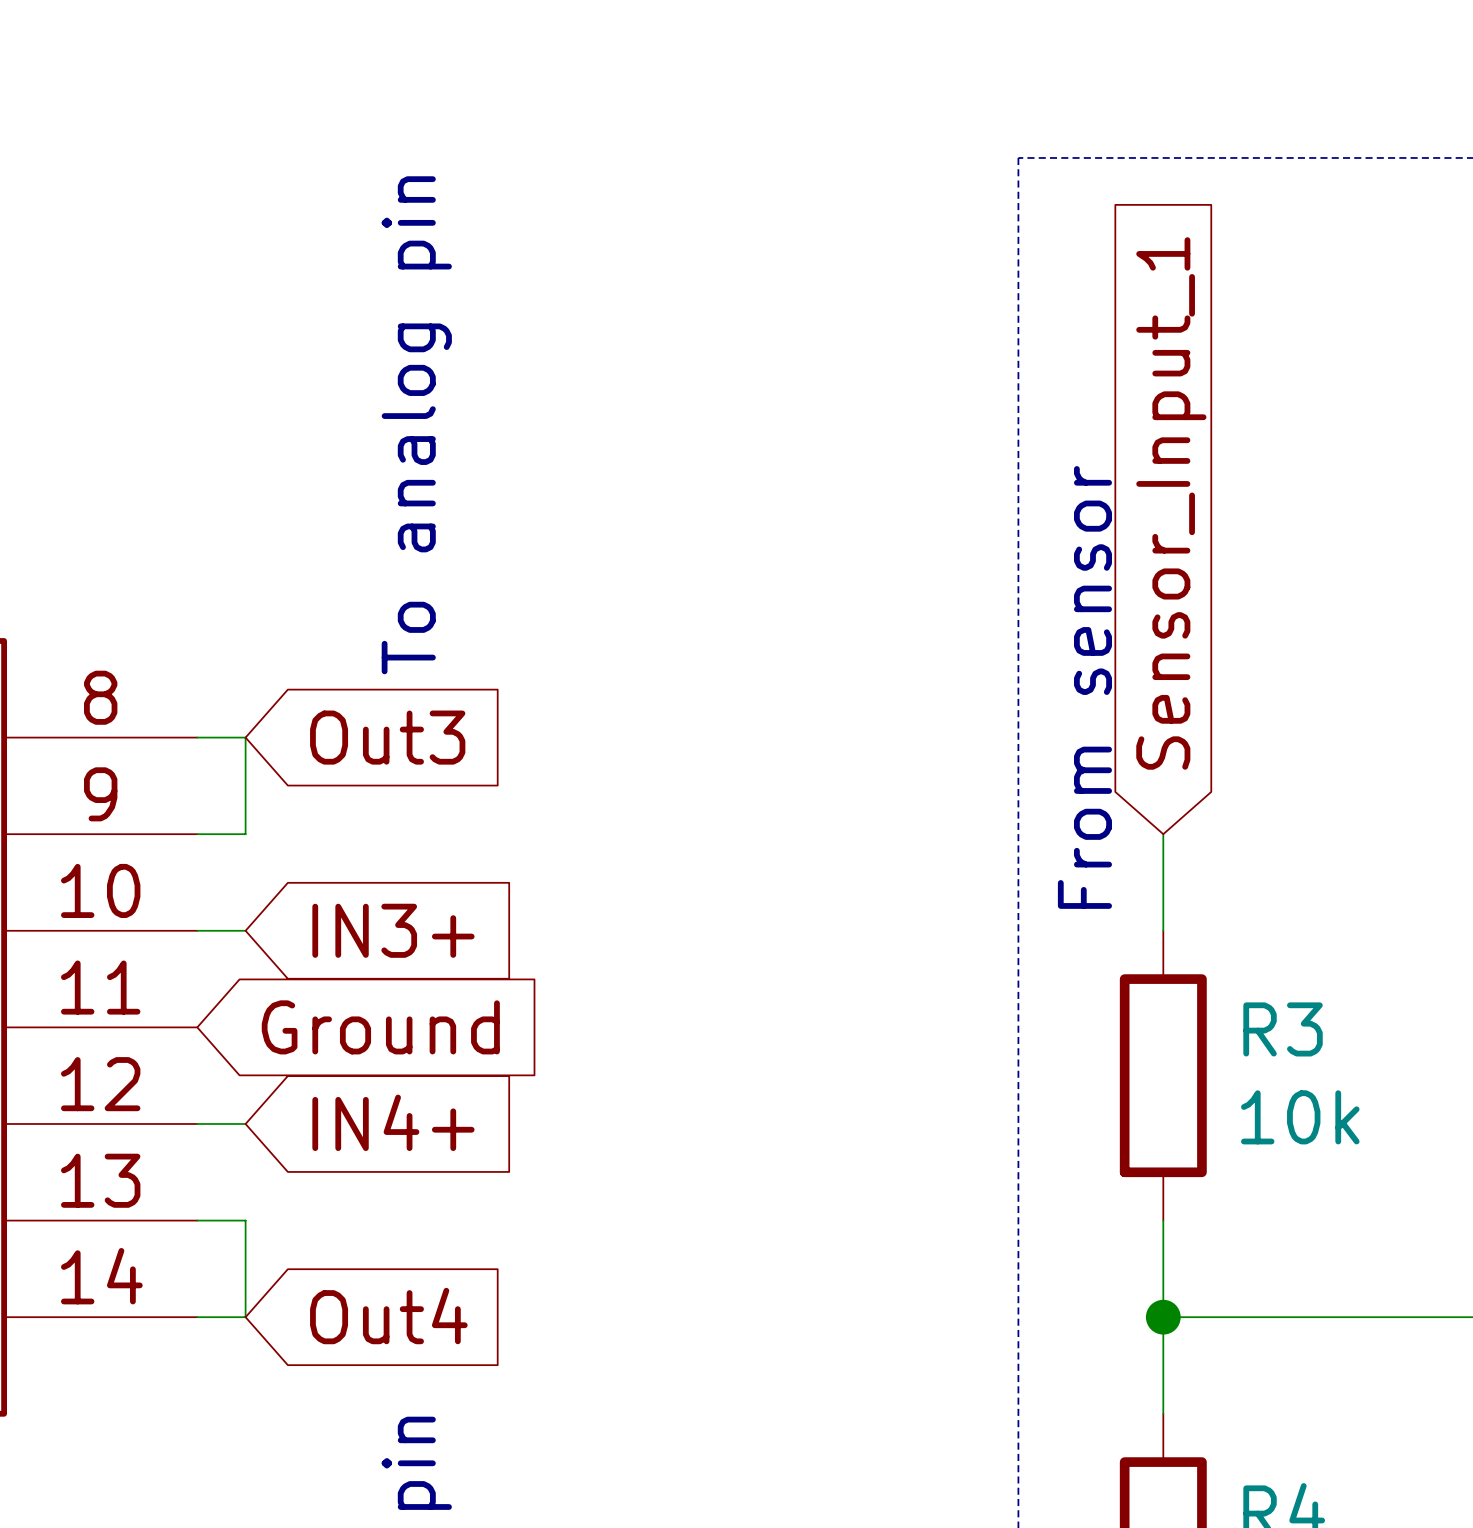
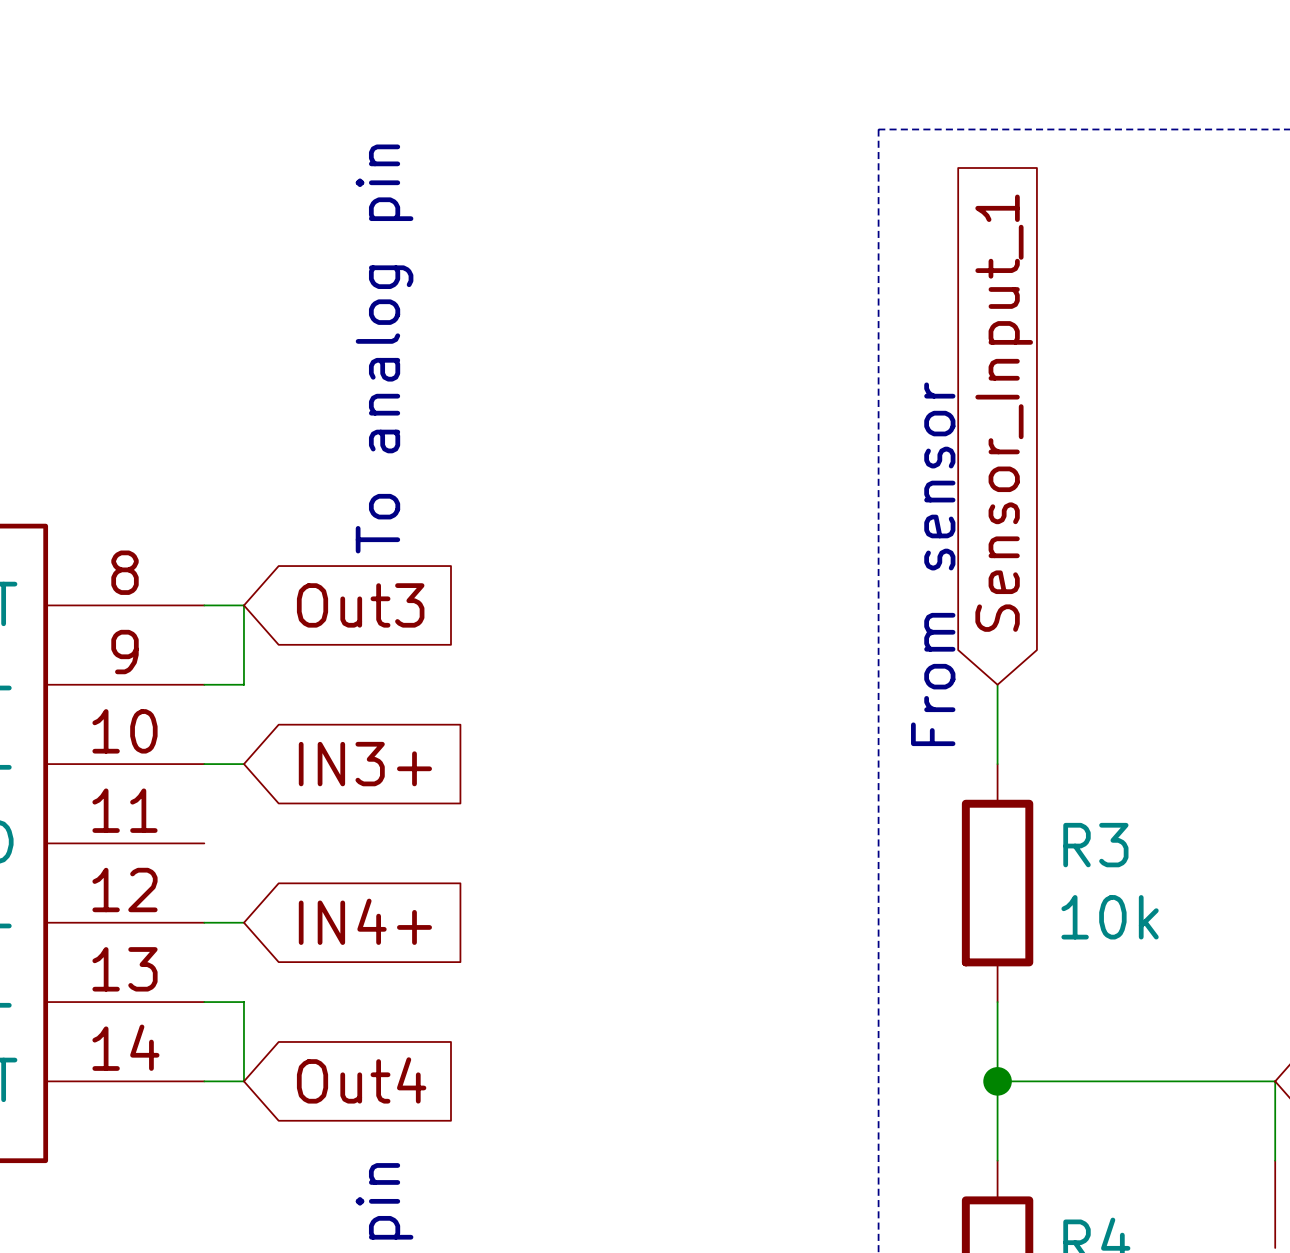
global label: Ground (380, 1027) -> none

